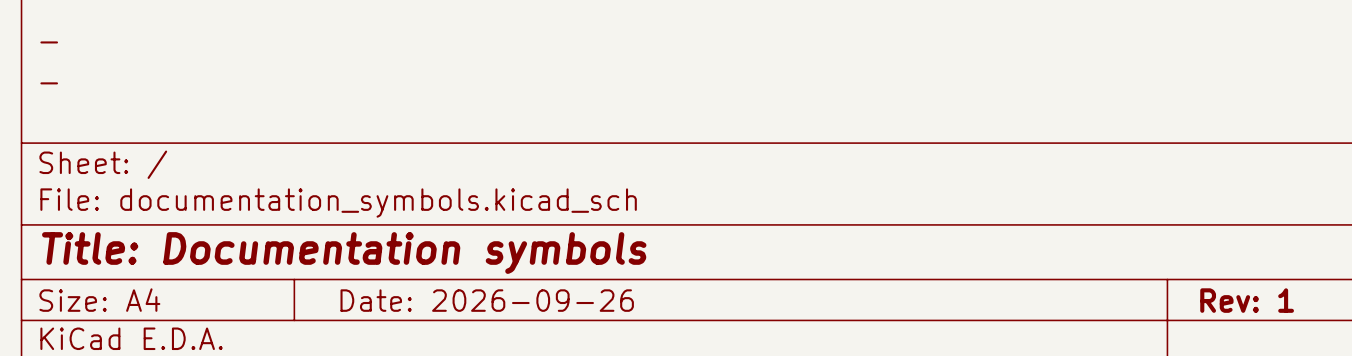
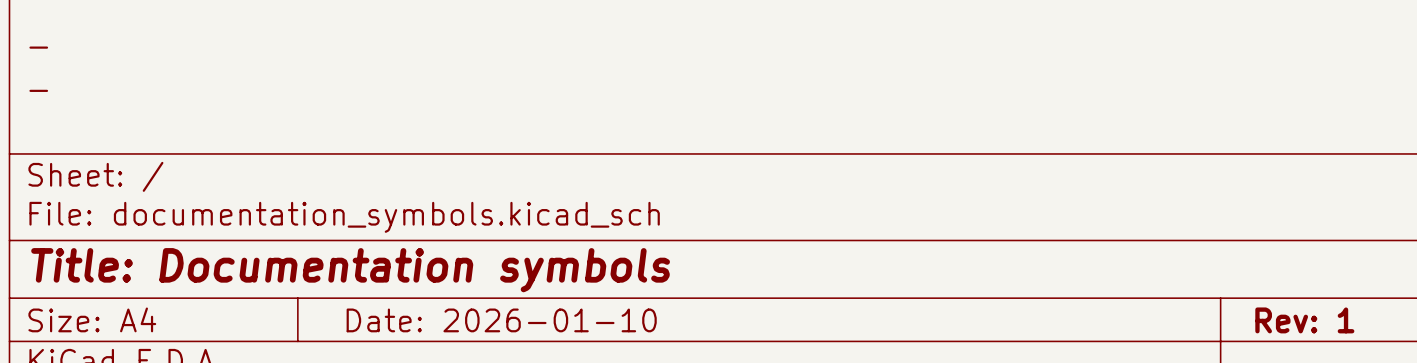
title block: Date: 2026-09-26 (487, 300) -> Date: 2026-01-10 (501, 320)

